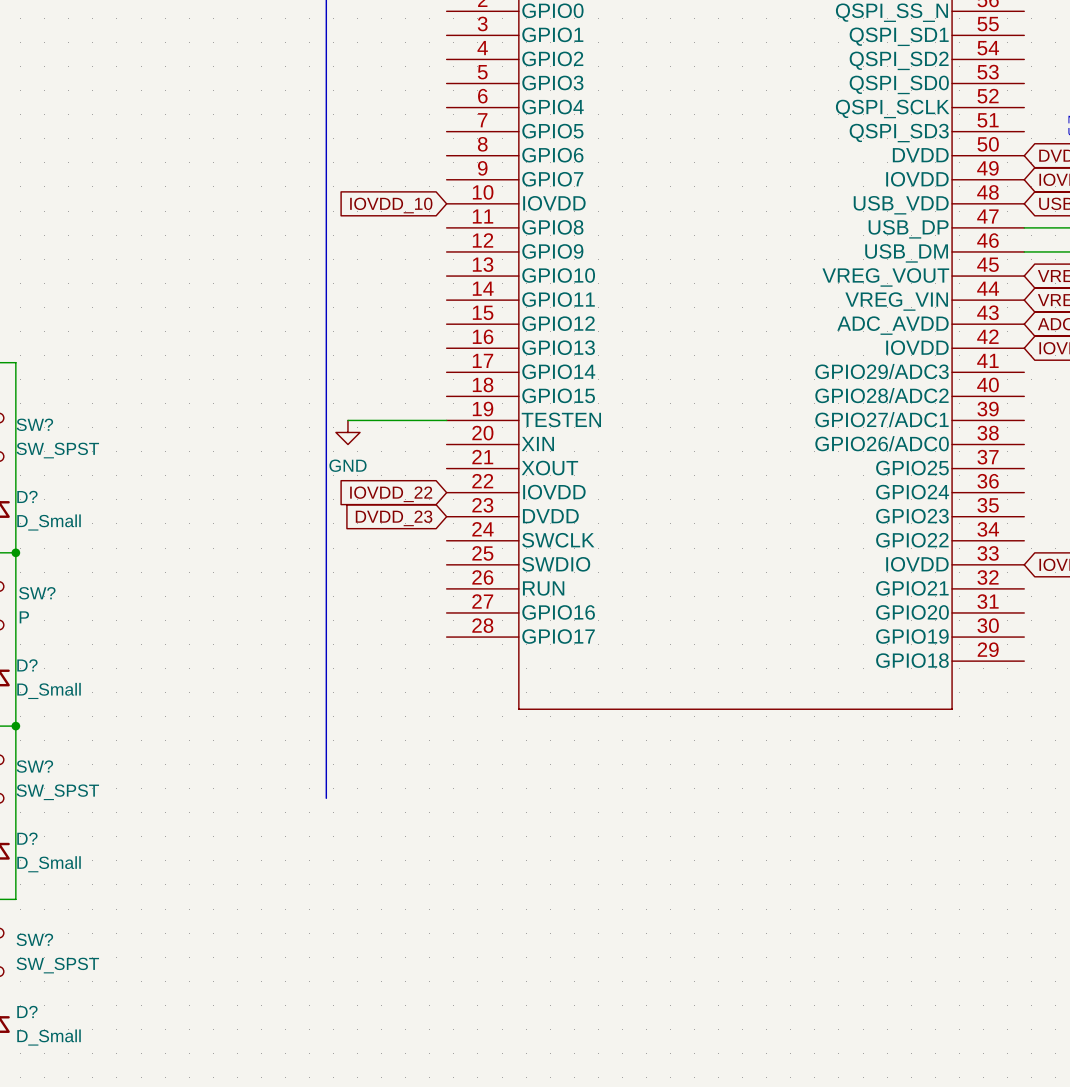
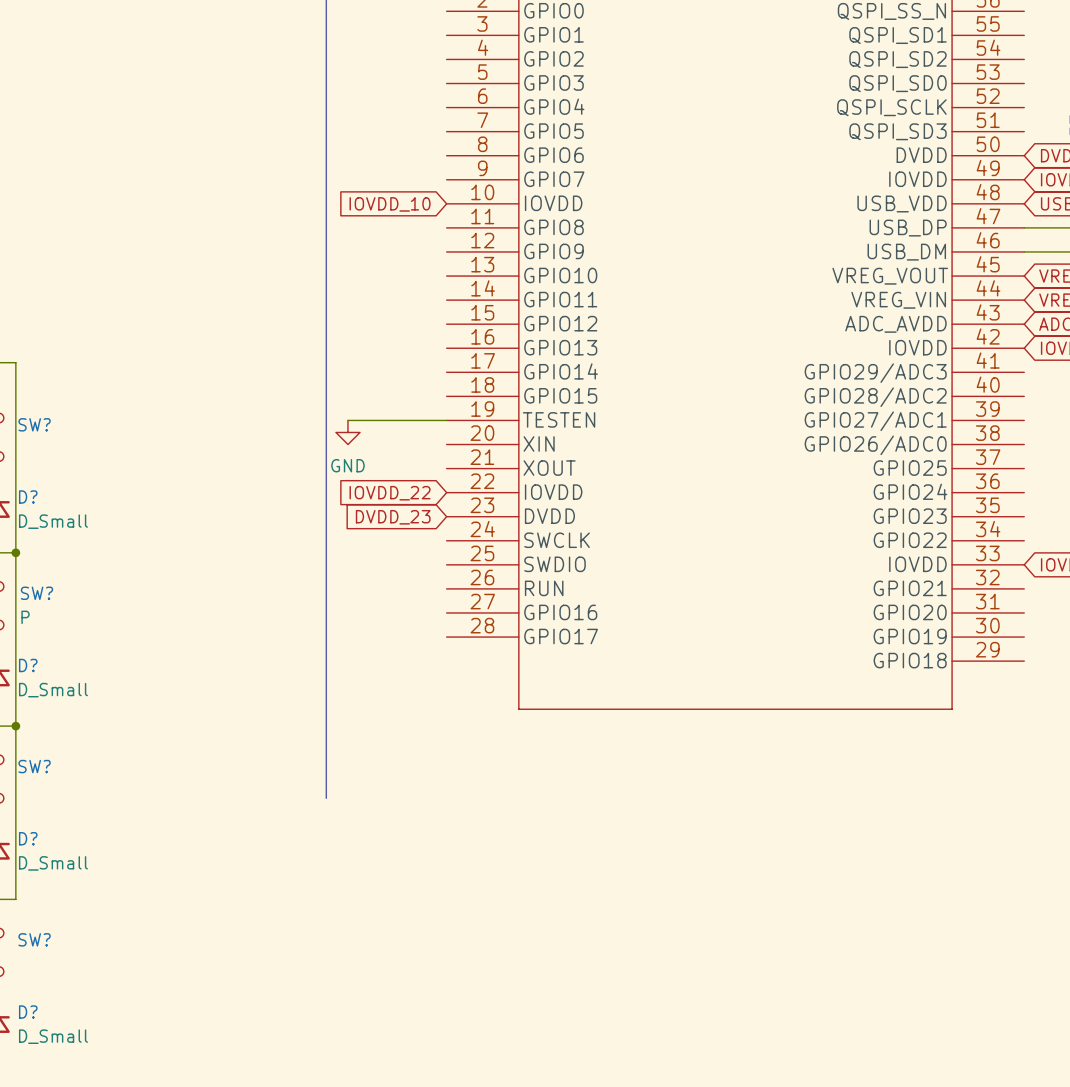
SW? value: SW_SPST (57, 450) -> none
SW? value: SW_SPST (57, 792) -> none
SW? value: SW_SPST (57, 965) -> none

